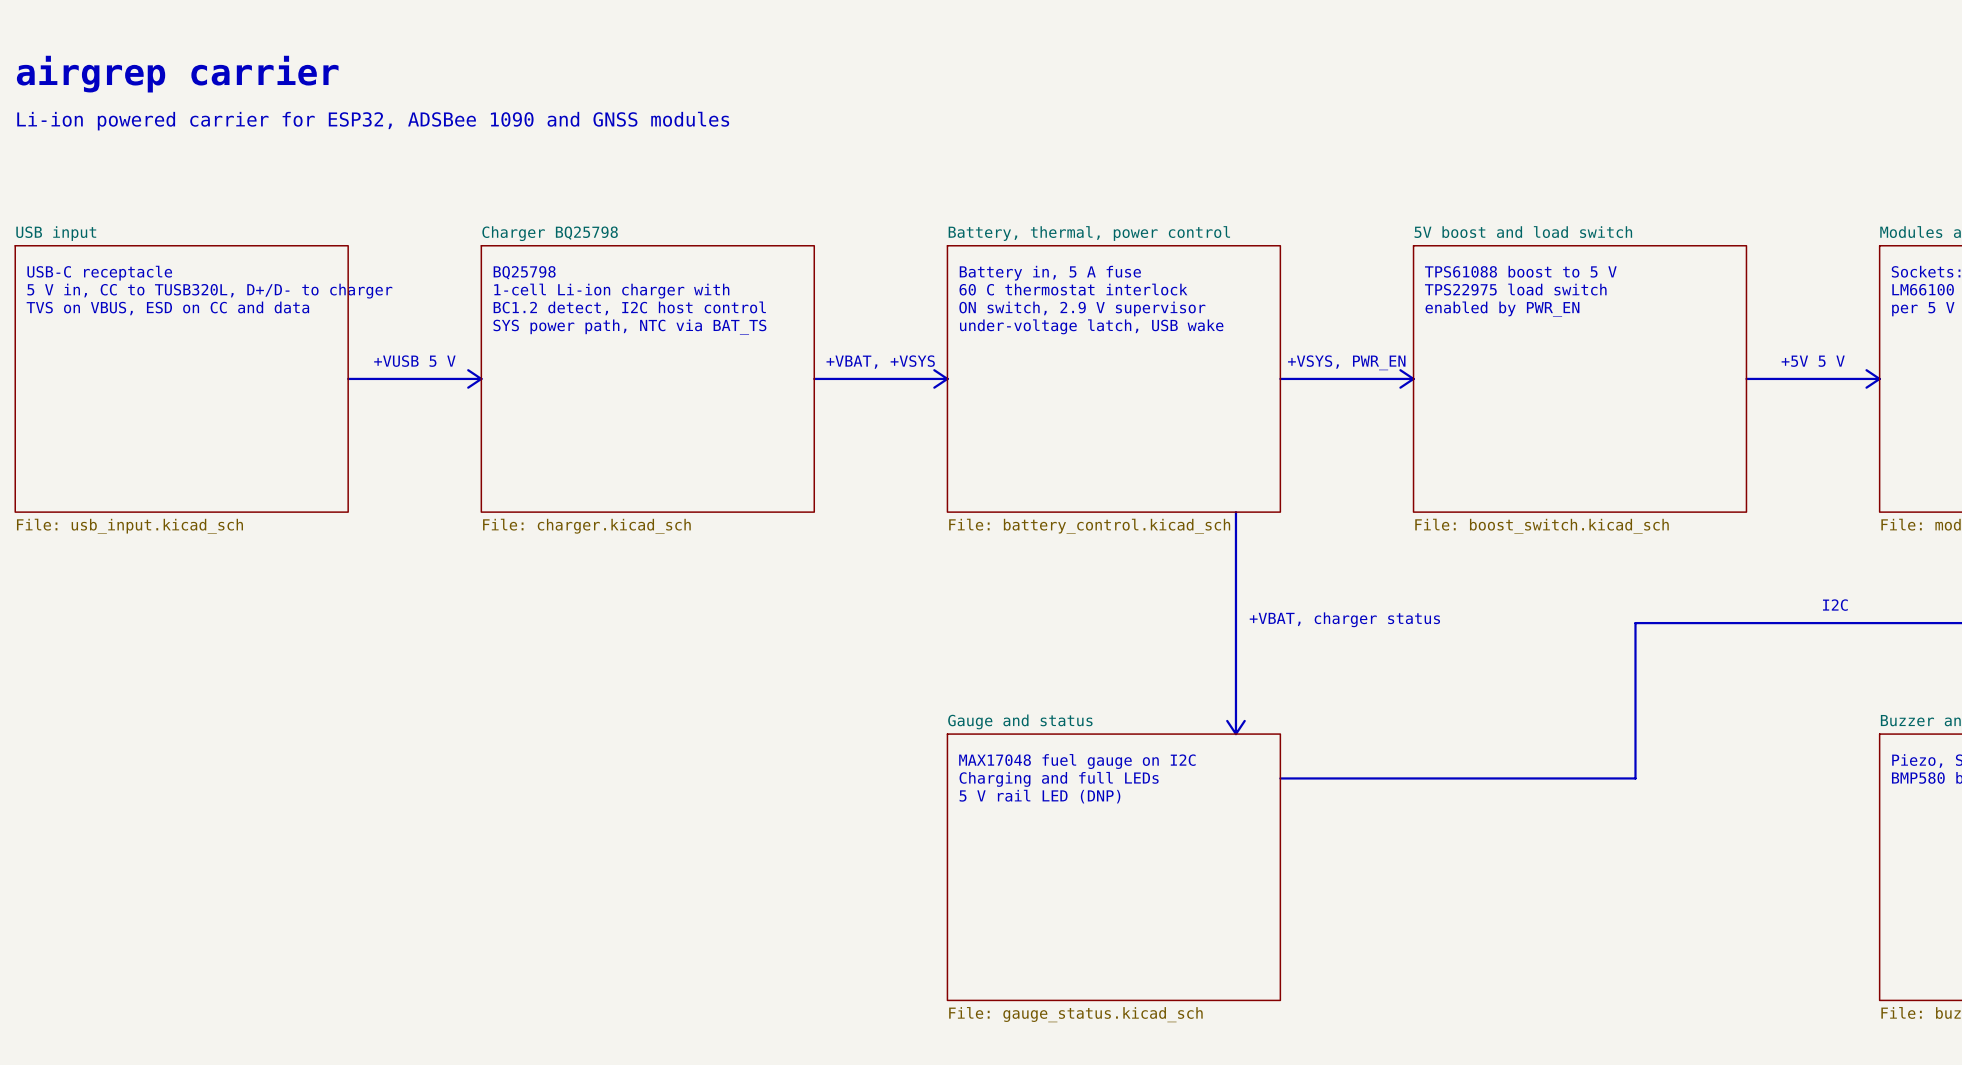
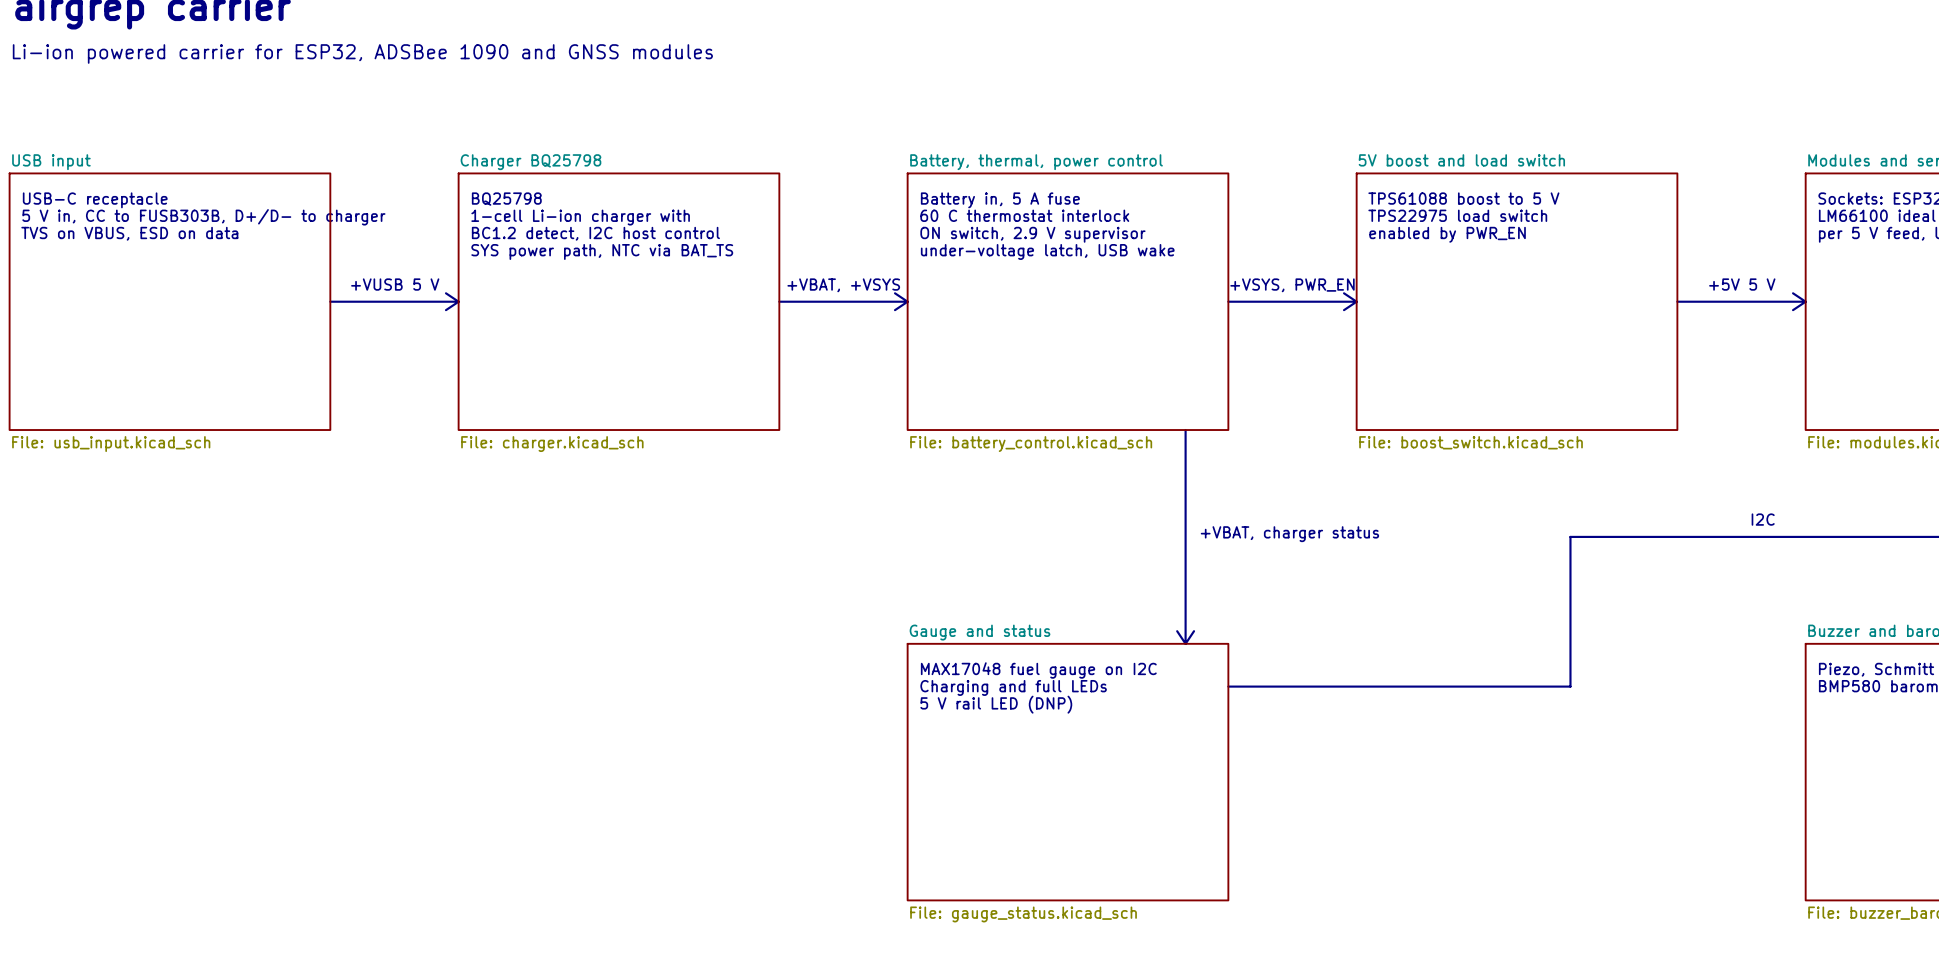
text: 5 V in, CC to TUSB320L, D+/D- to charger (209, 291) -> 5 V in, CC to FUSB303B, D+/D- to charger (203, 217)
text: TVS on VBUS, ESD on CC and data (167, 308) -> TVS on VBUS, ESD on data (129, 233)

